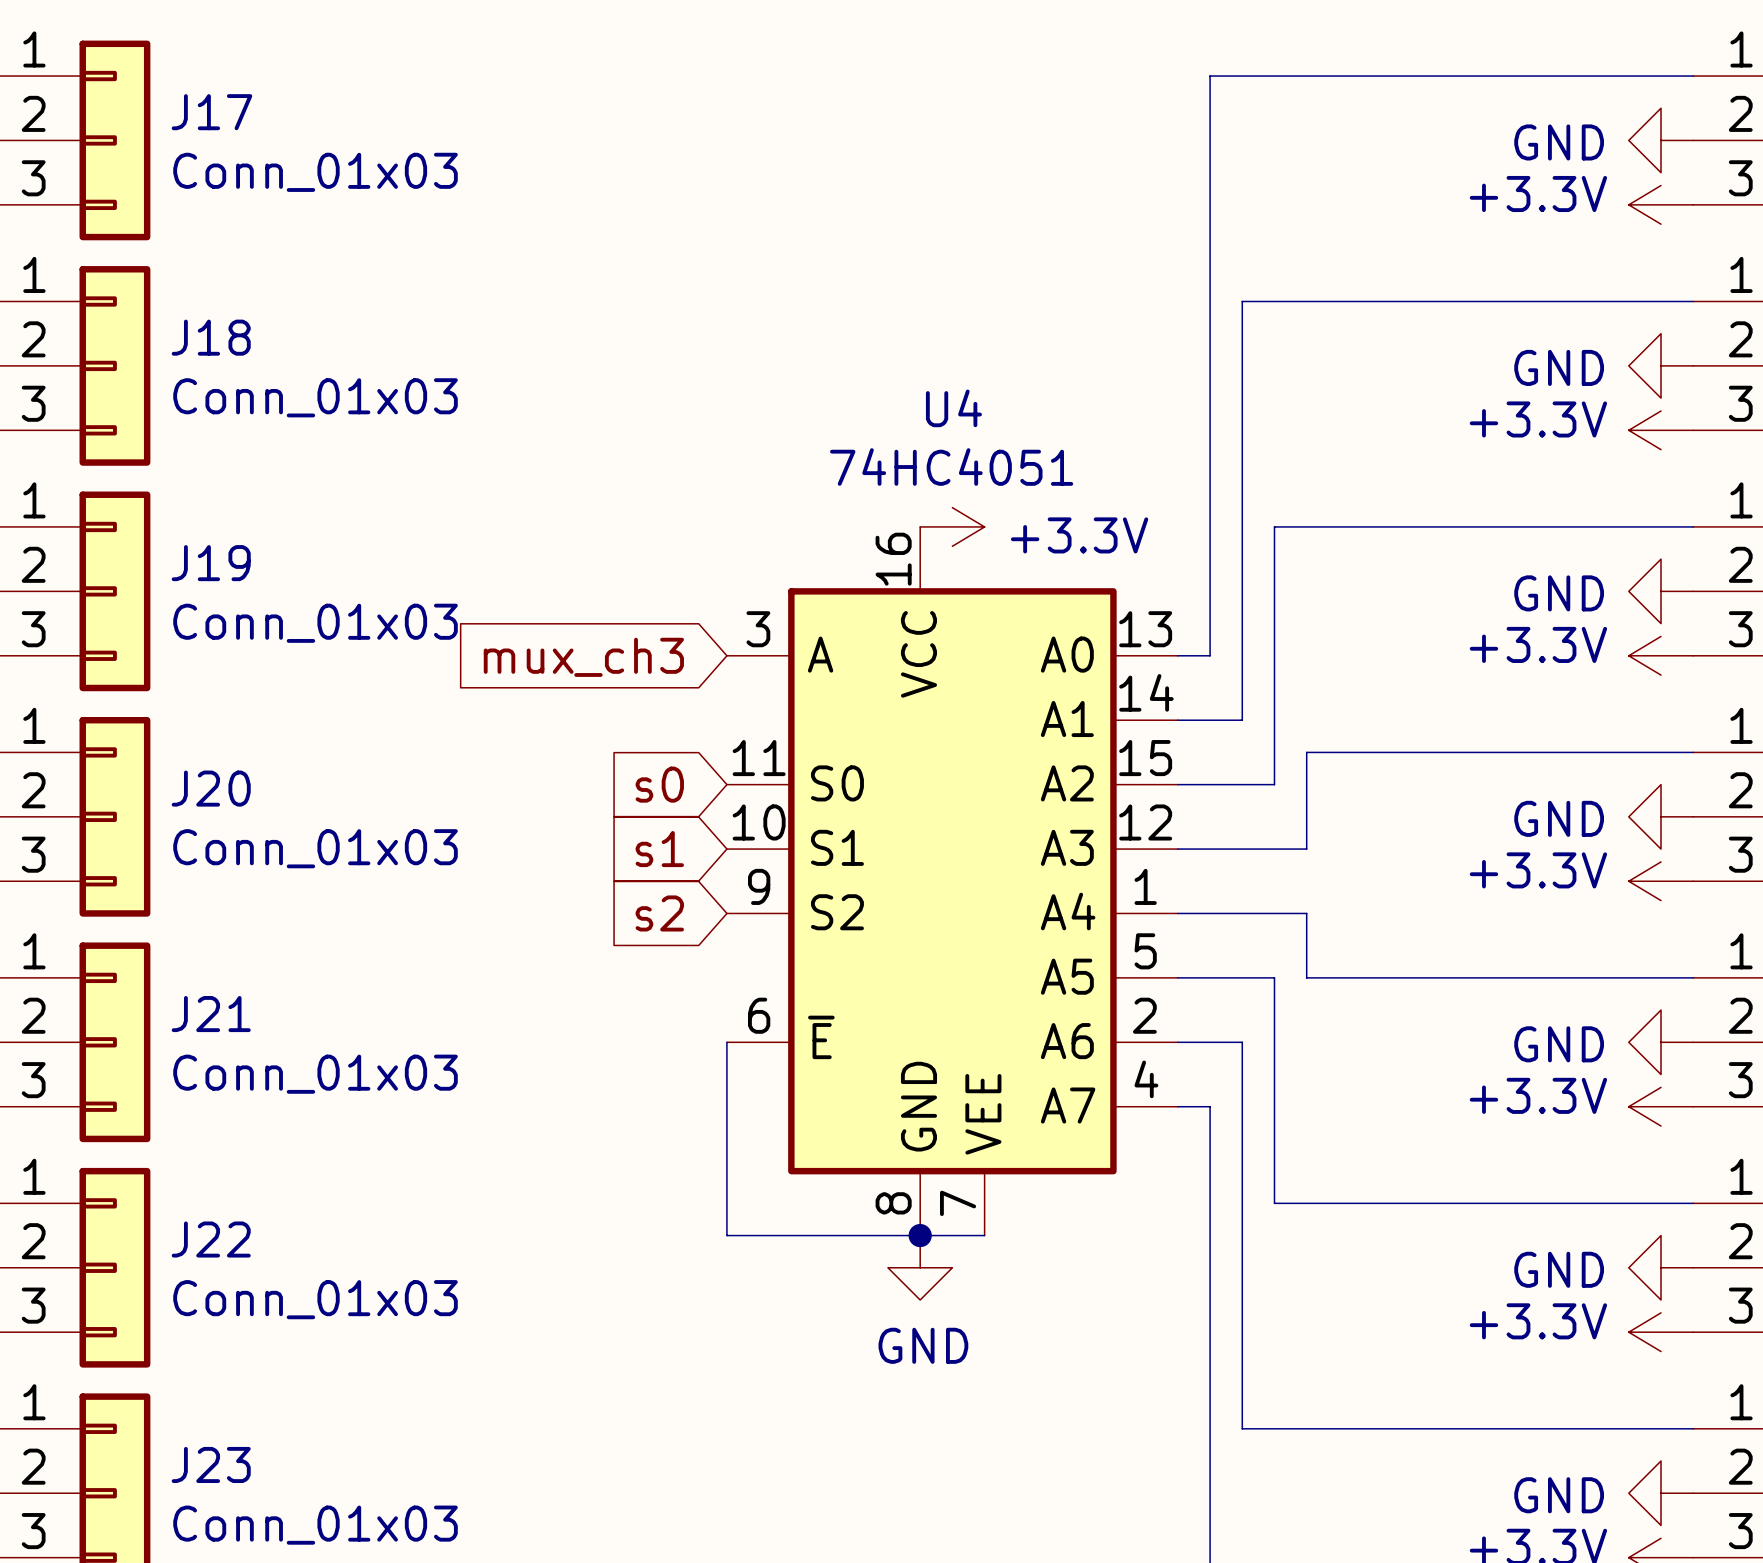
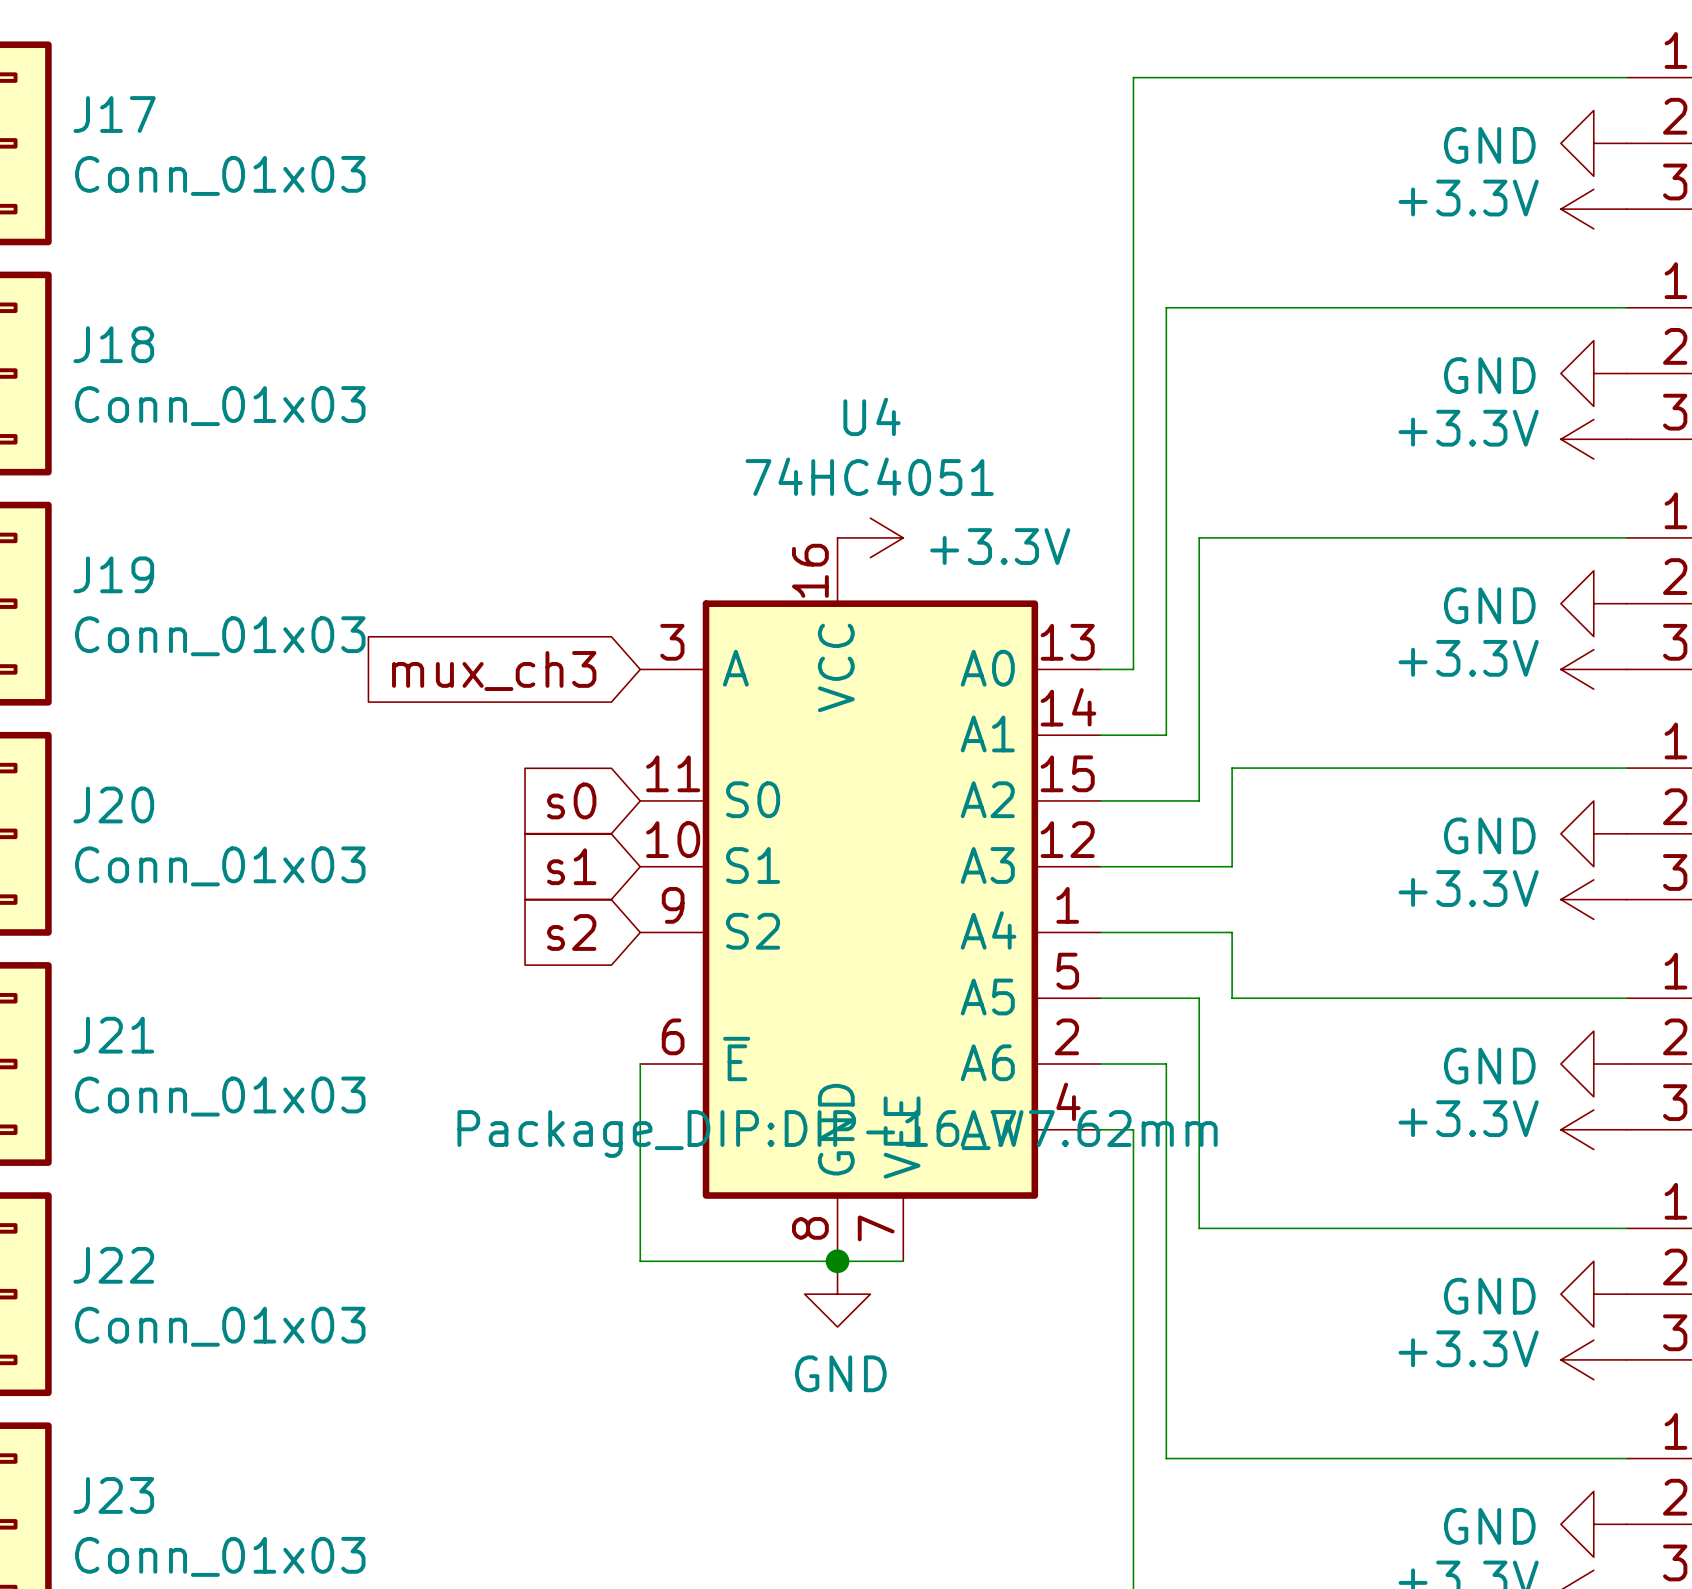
U4 text: none -> Package_DIP:DIP-16_W7.62mm (837, 1134)

